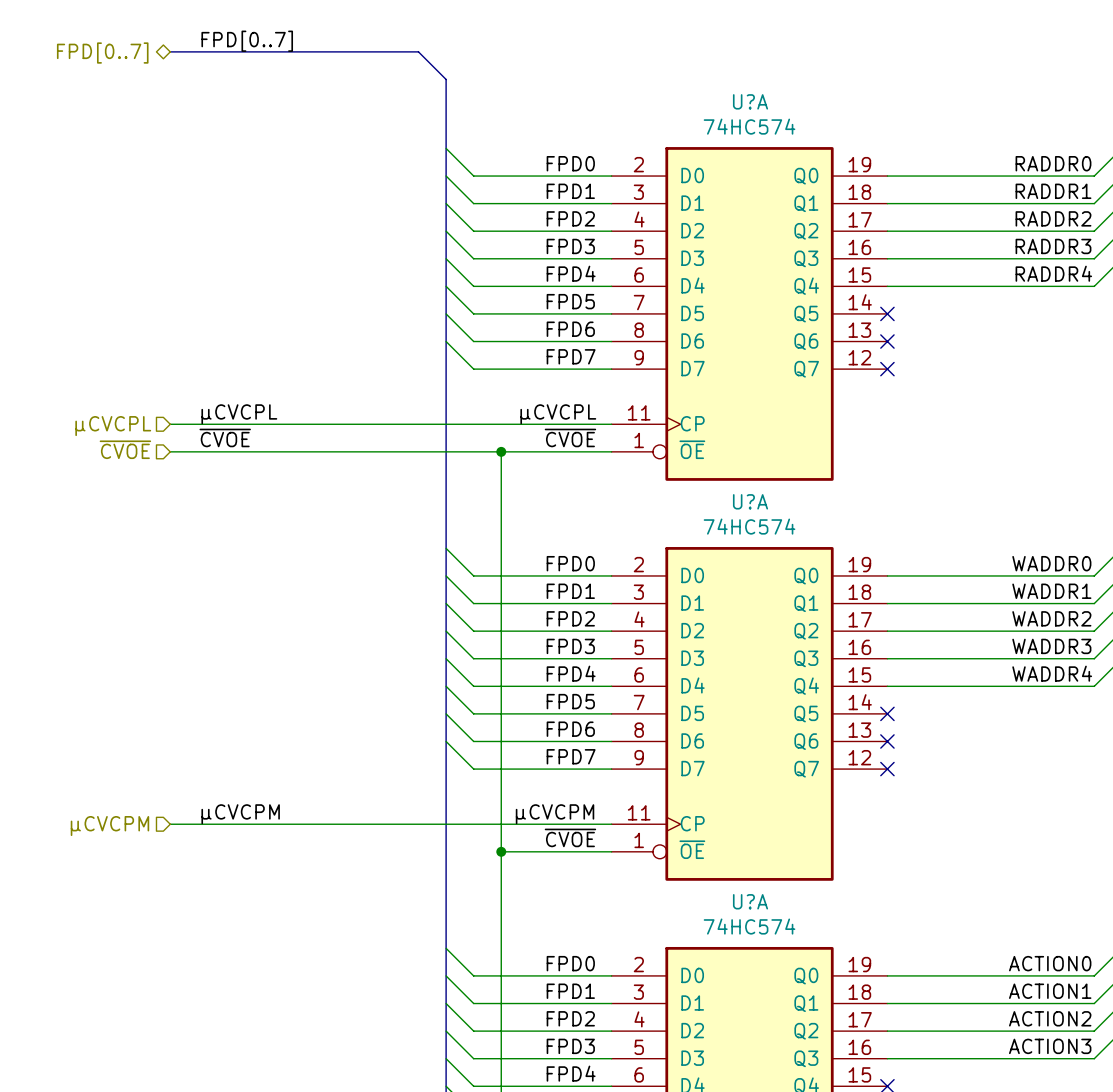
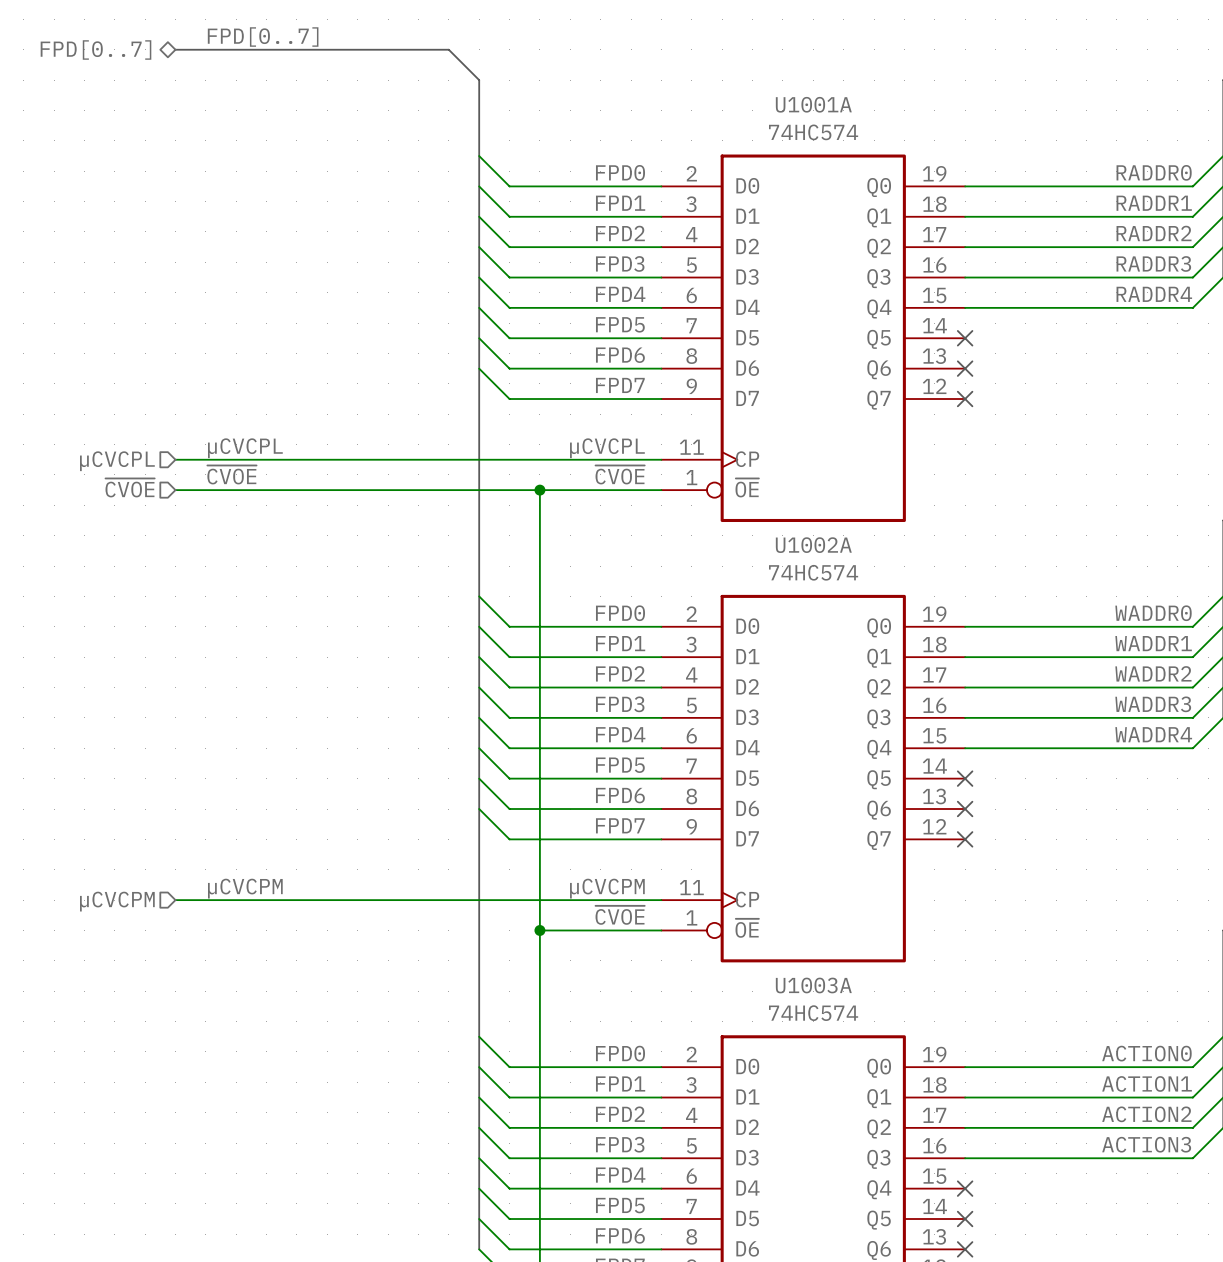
U?A name: U?A (750, 101) -> U1001A (813, 104)
U?A name: U?A (750, 501) -> U1002A (813, 545)
U?A name: U?A (750, 901) -> U1003A (813, 985)

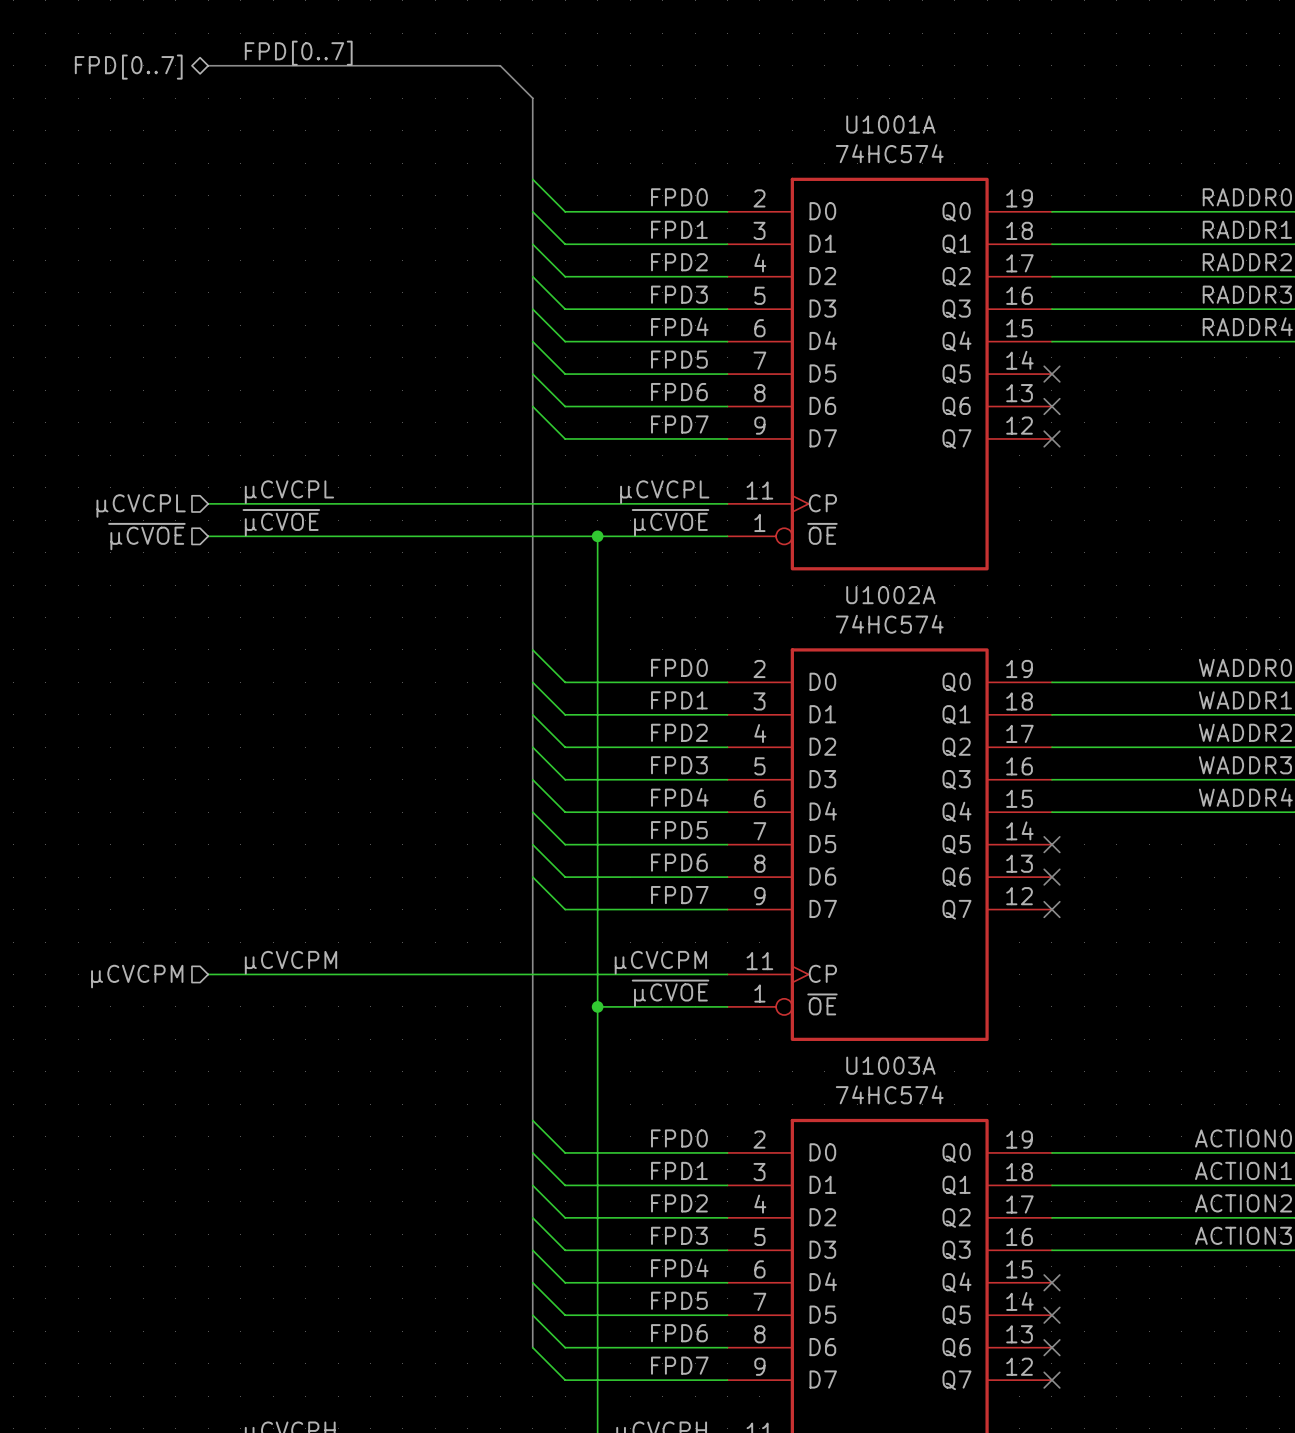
label: ~{CVOE} (231, 474) -> ~{µCVOE} (281, 522)
label: ~{CVOE} (620, 474) -> ~{µCVOE} (670, 522)
hierarchical label: ~{CVOE} (130, 487) -> ~{µCVOE} (146, 536)
label: ~{CVOE} (620, 915) -> ~{µCVOE} (670, 993)

